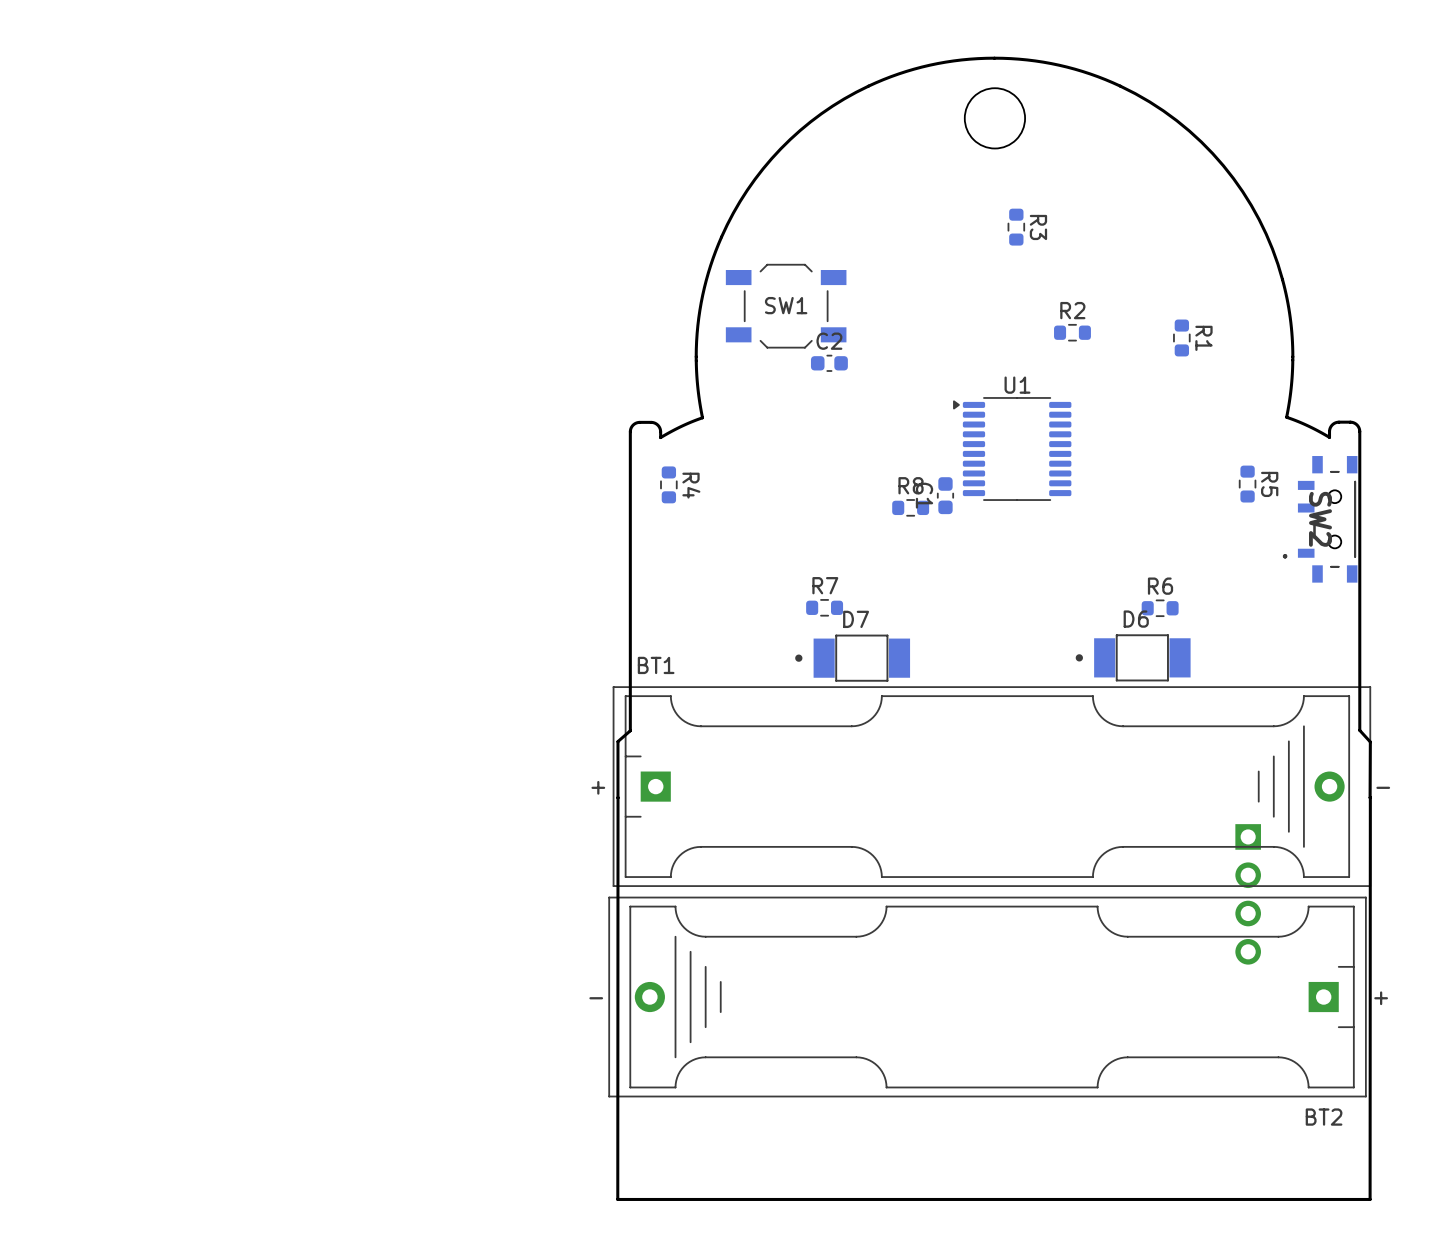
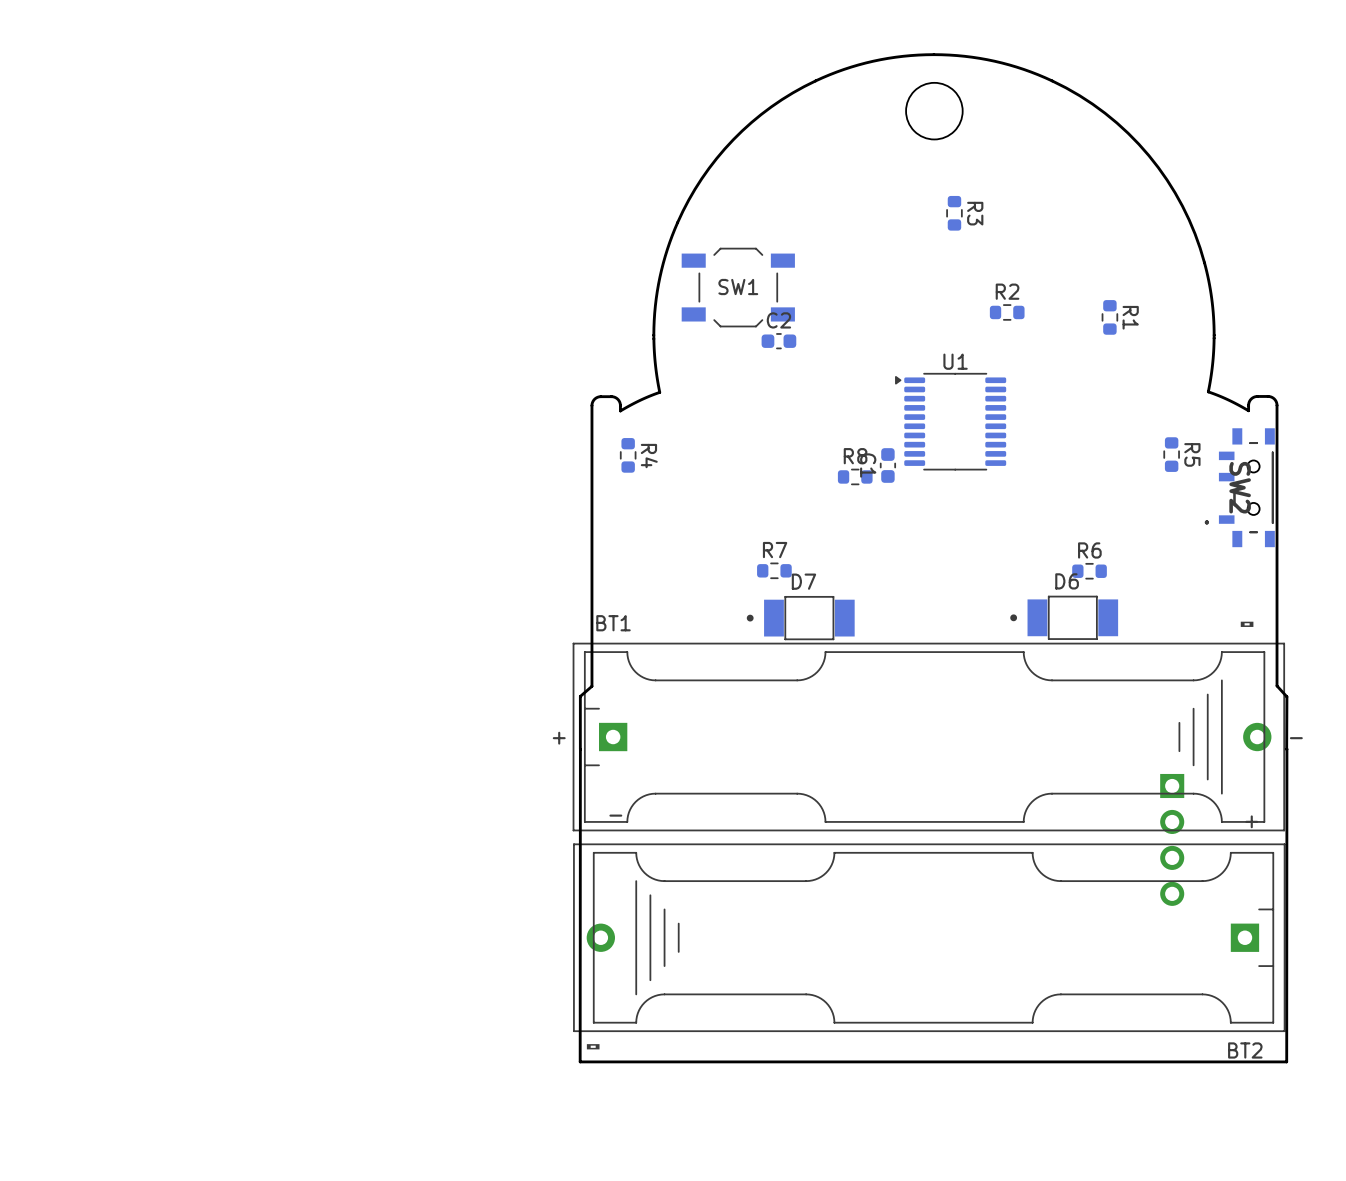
drawing: none -> [1240, 621, 1254, 627]
BT1 footprint: [612, 686, 1372, 887] -> [572, 642, 1286, 832]
board edge: (1370, 797) (1370, 1199) (617, 1199) (618, 797) -> (1286, 749) (1286, 1061) (580, 1061) (580, 749)
BT2 footprint: [608, 896, 1367, 1098] -> [573, 843, 1286, 1033]
drawing: none -> [586, 1044, 600, 1050]

